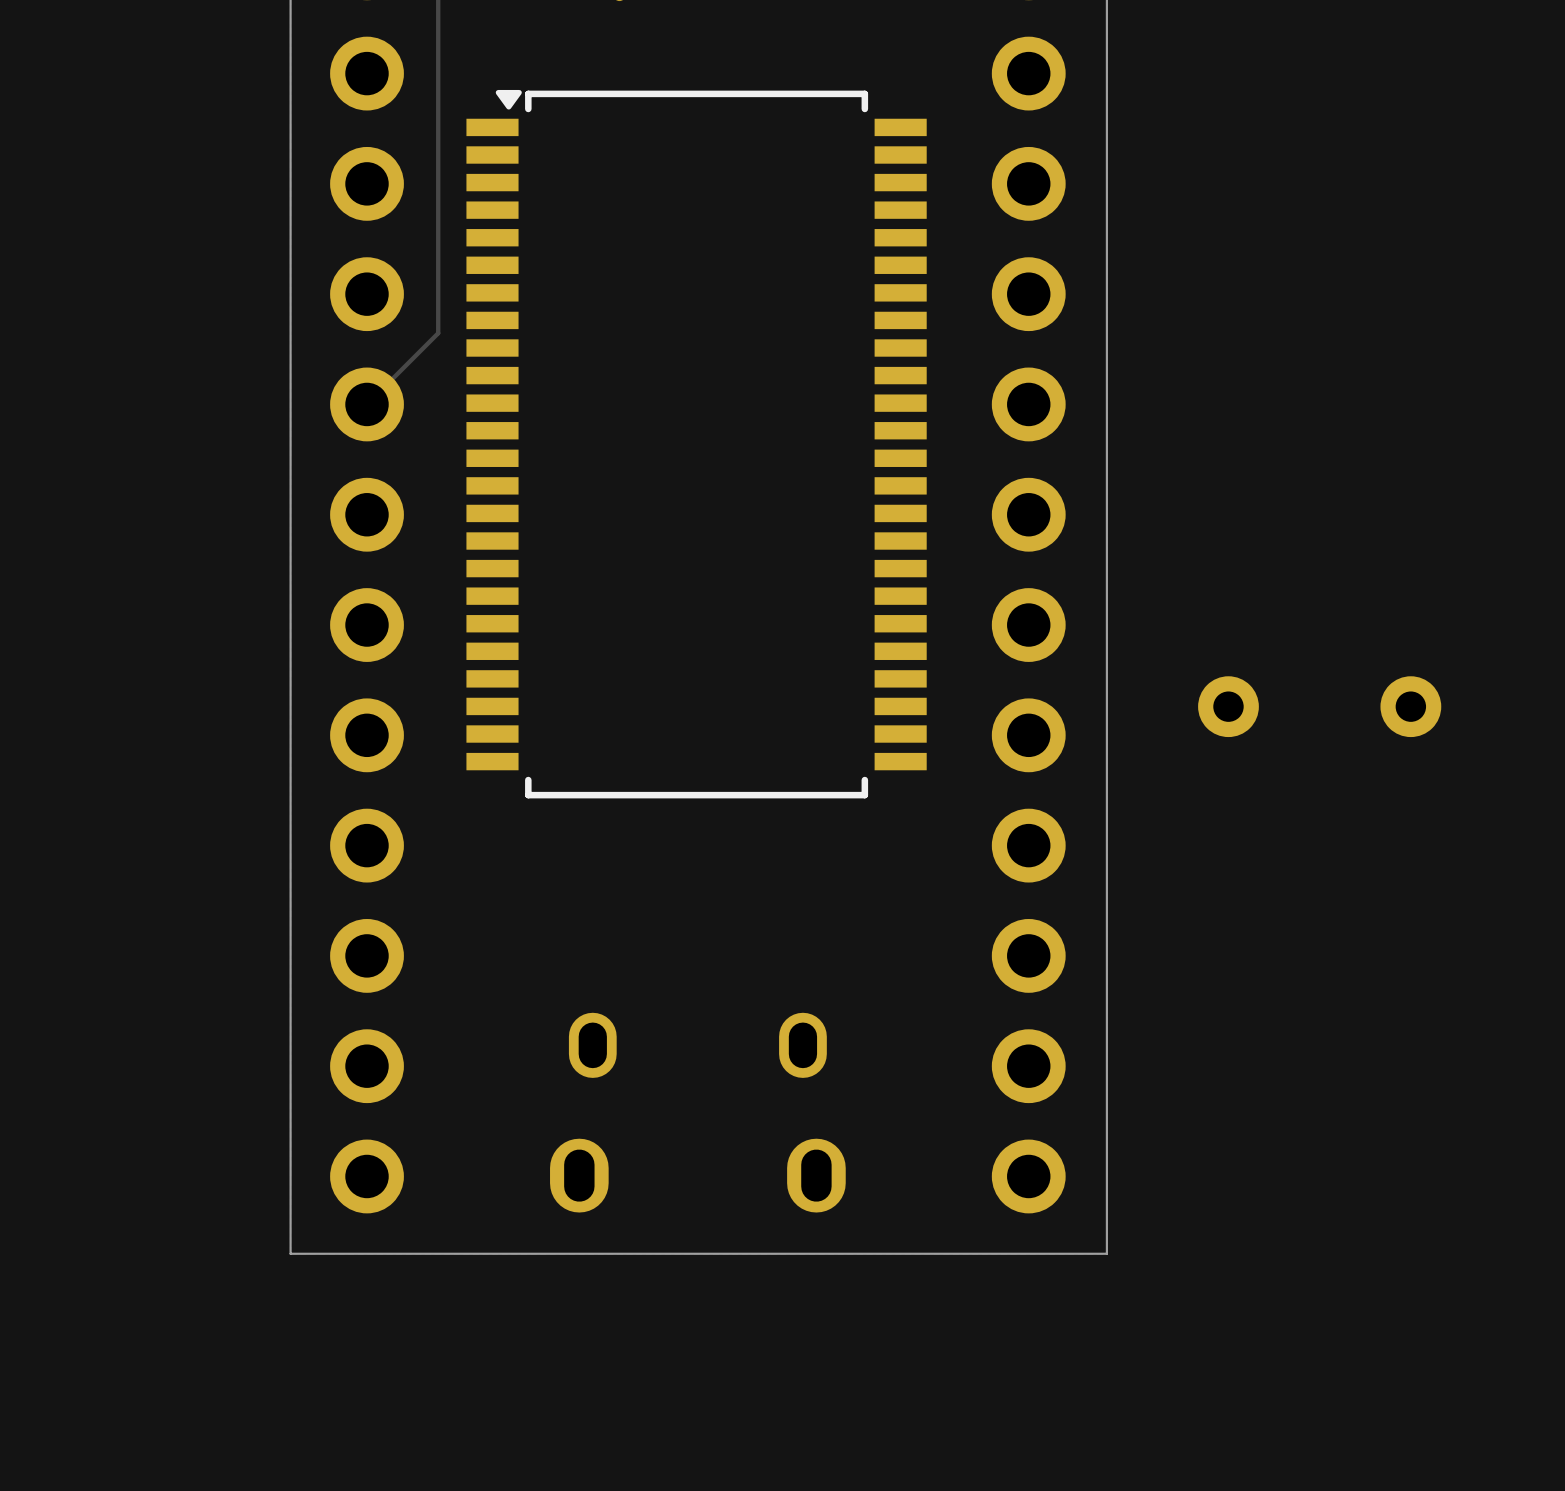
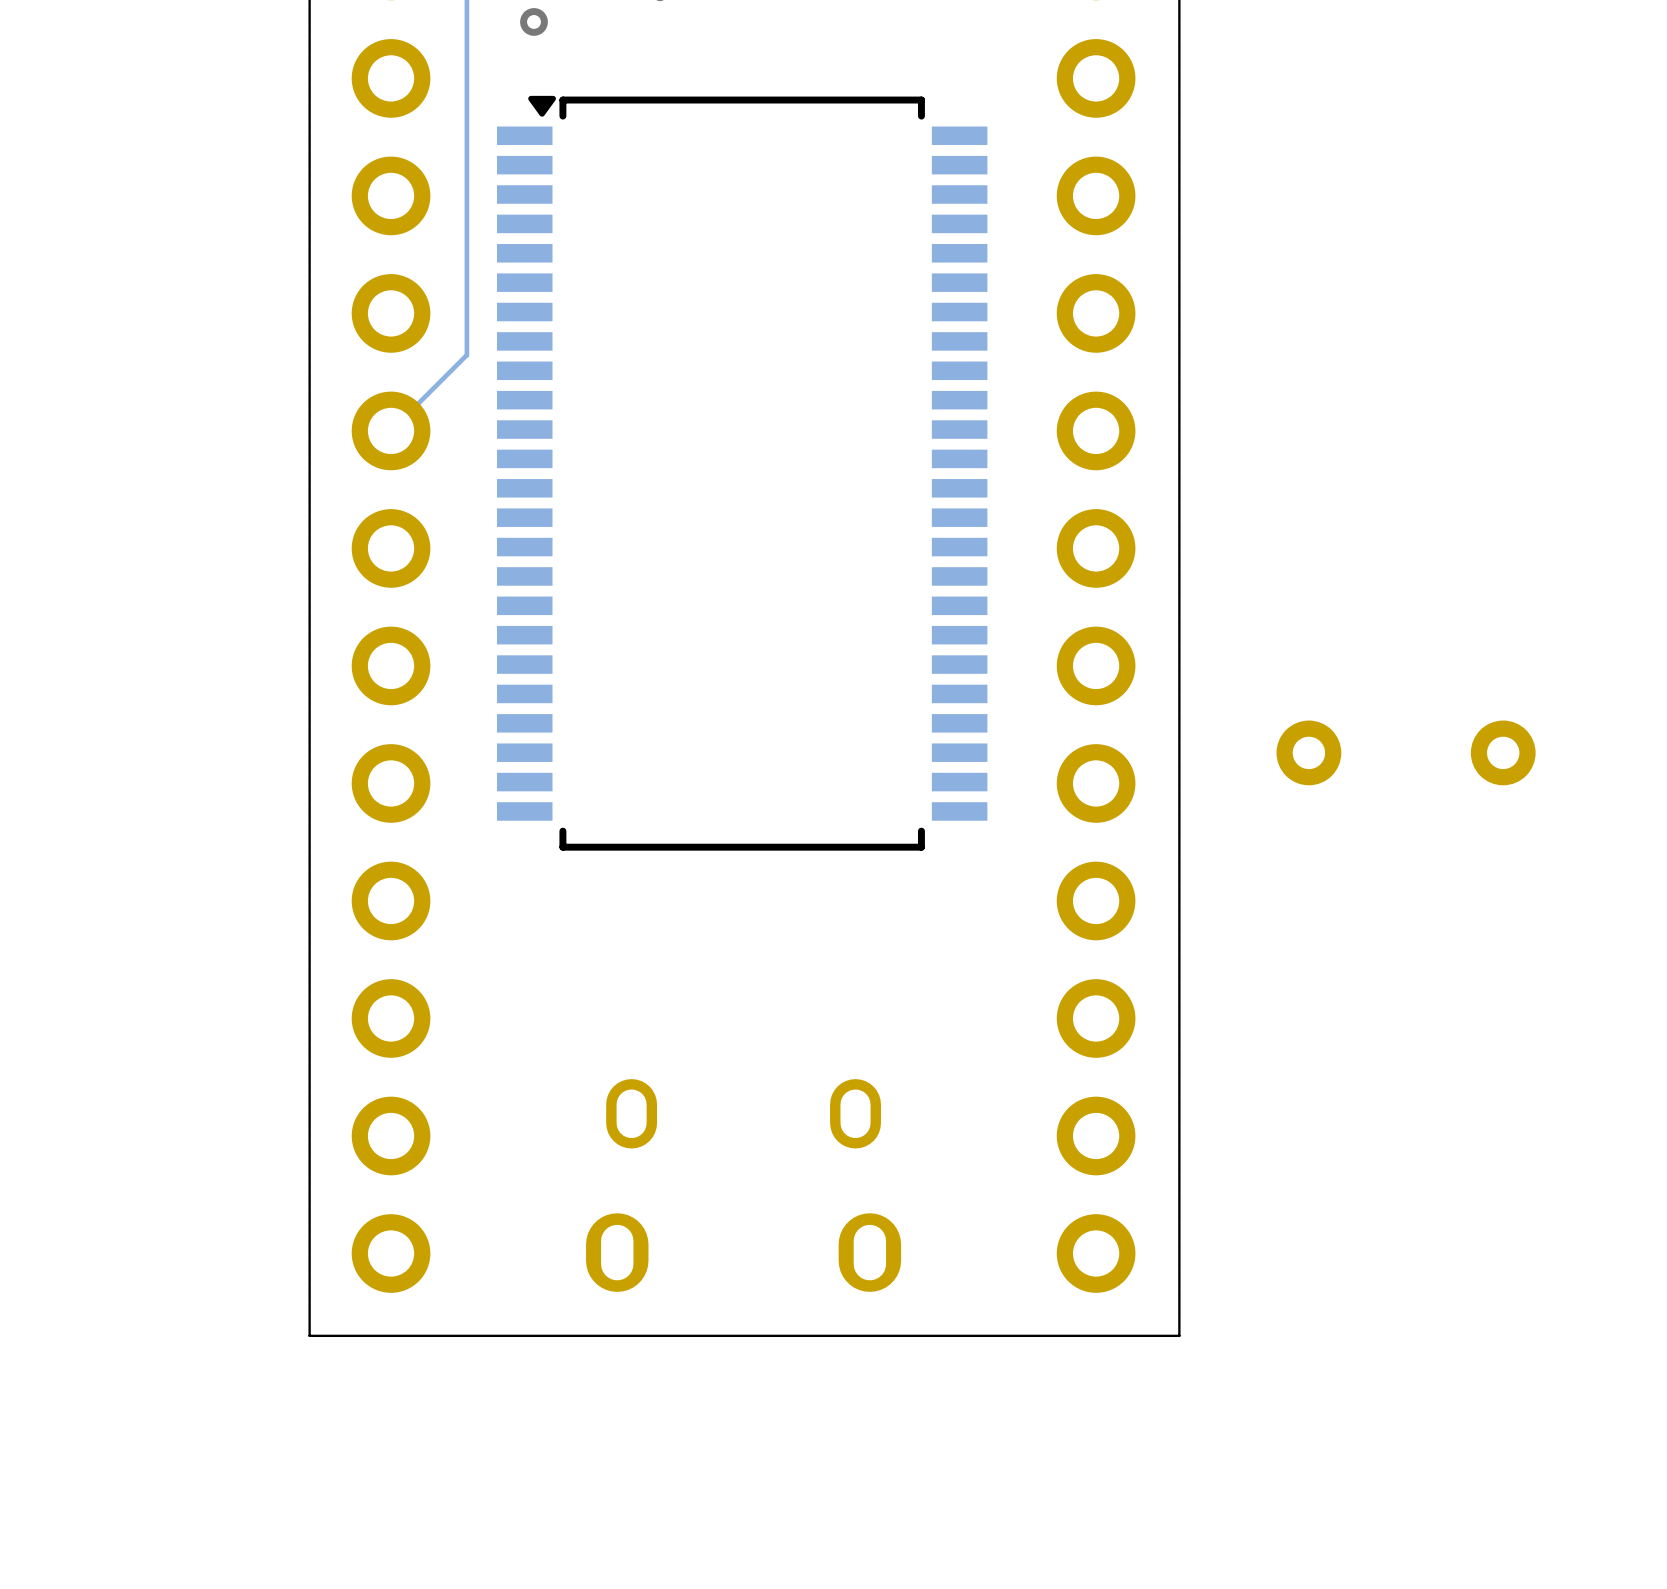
via: none -> (533, 21)

